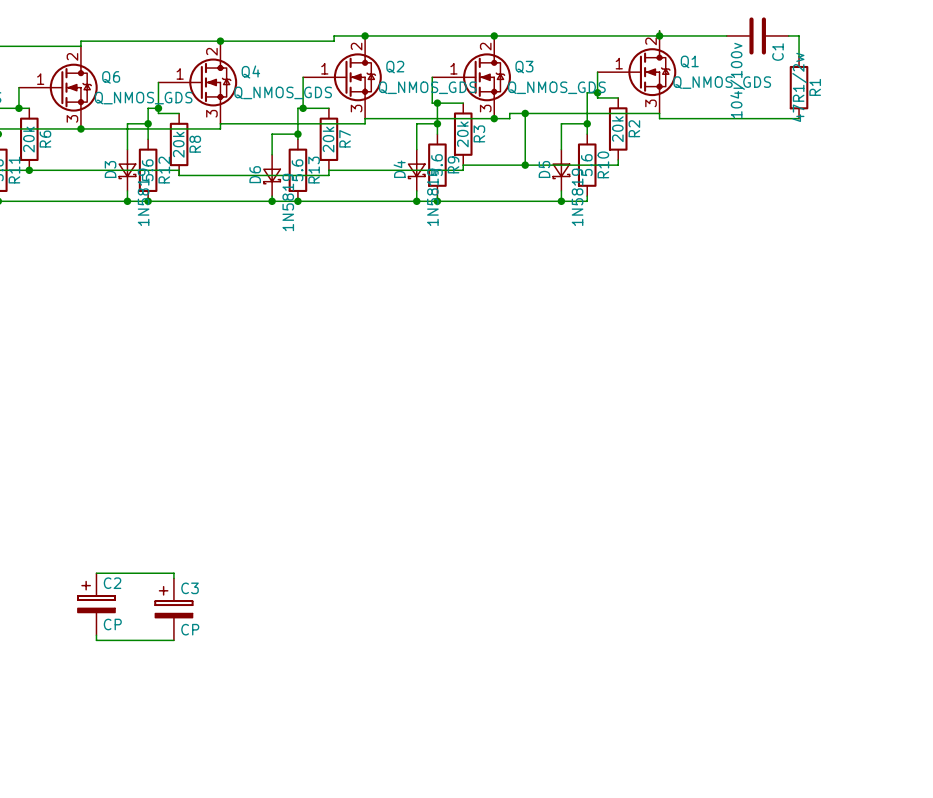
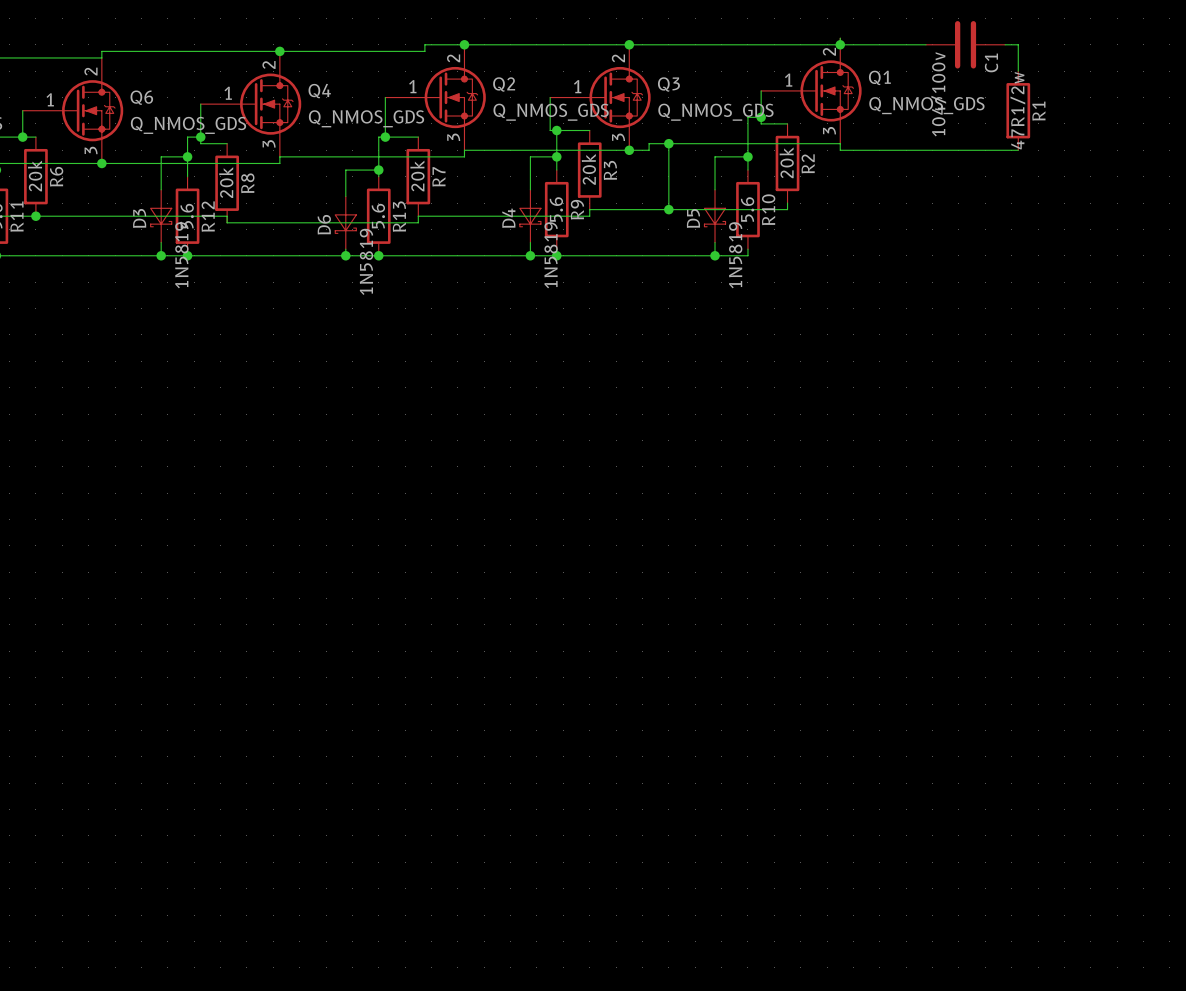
wire: (96, 573) (173, 573) (173, 578) -> none
C2: CP (96, 604) -> none
C3: CP (173, 609) -> none
wire: (96, 635) (96, 640) (173, 640) -> none

